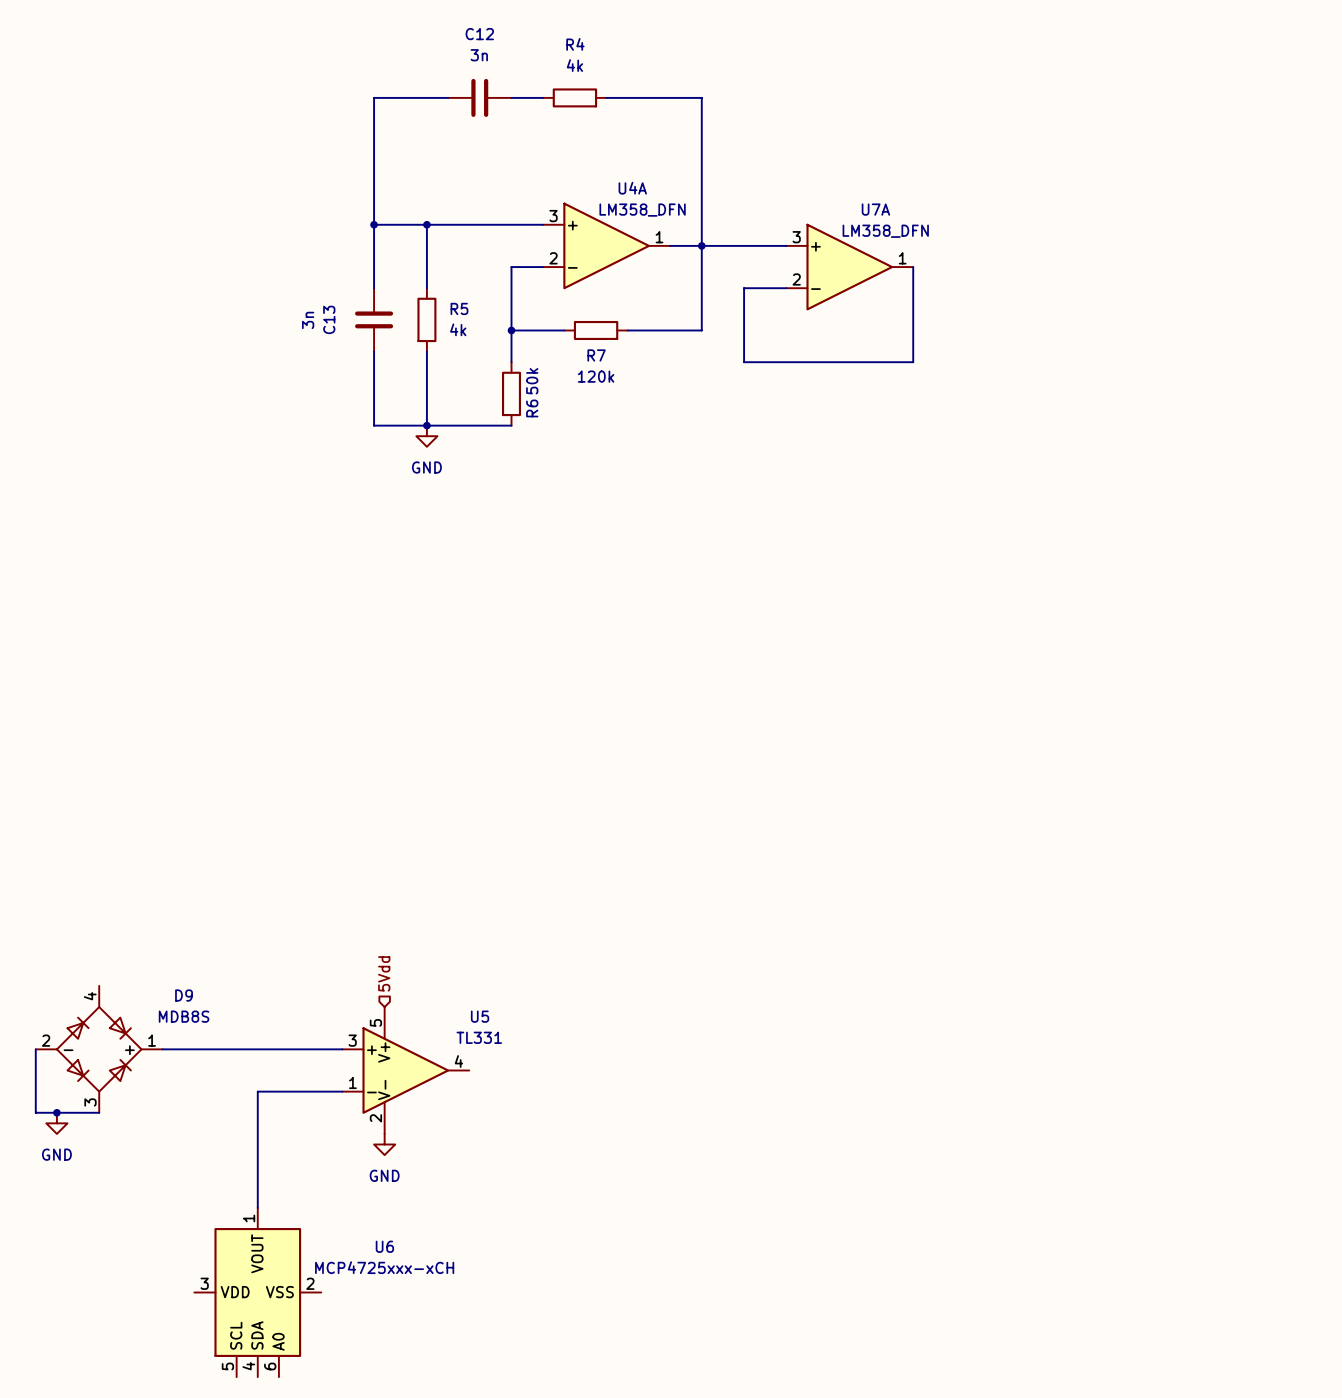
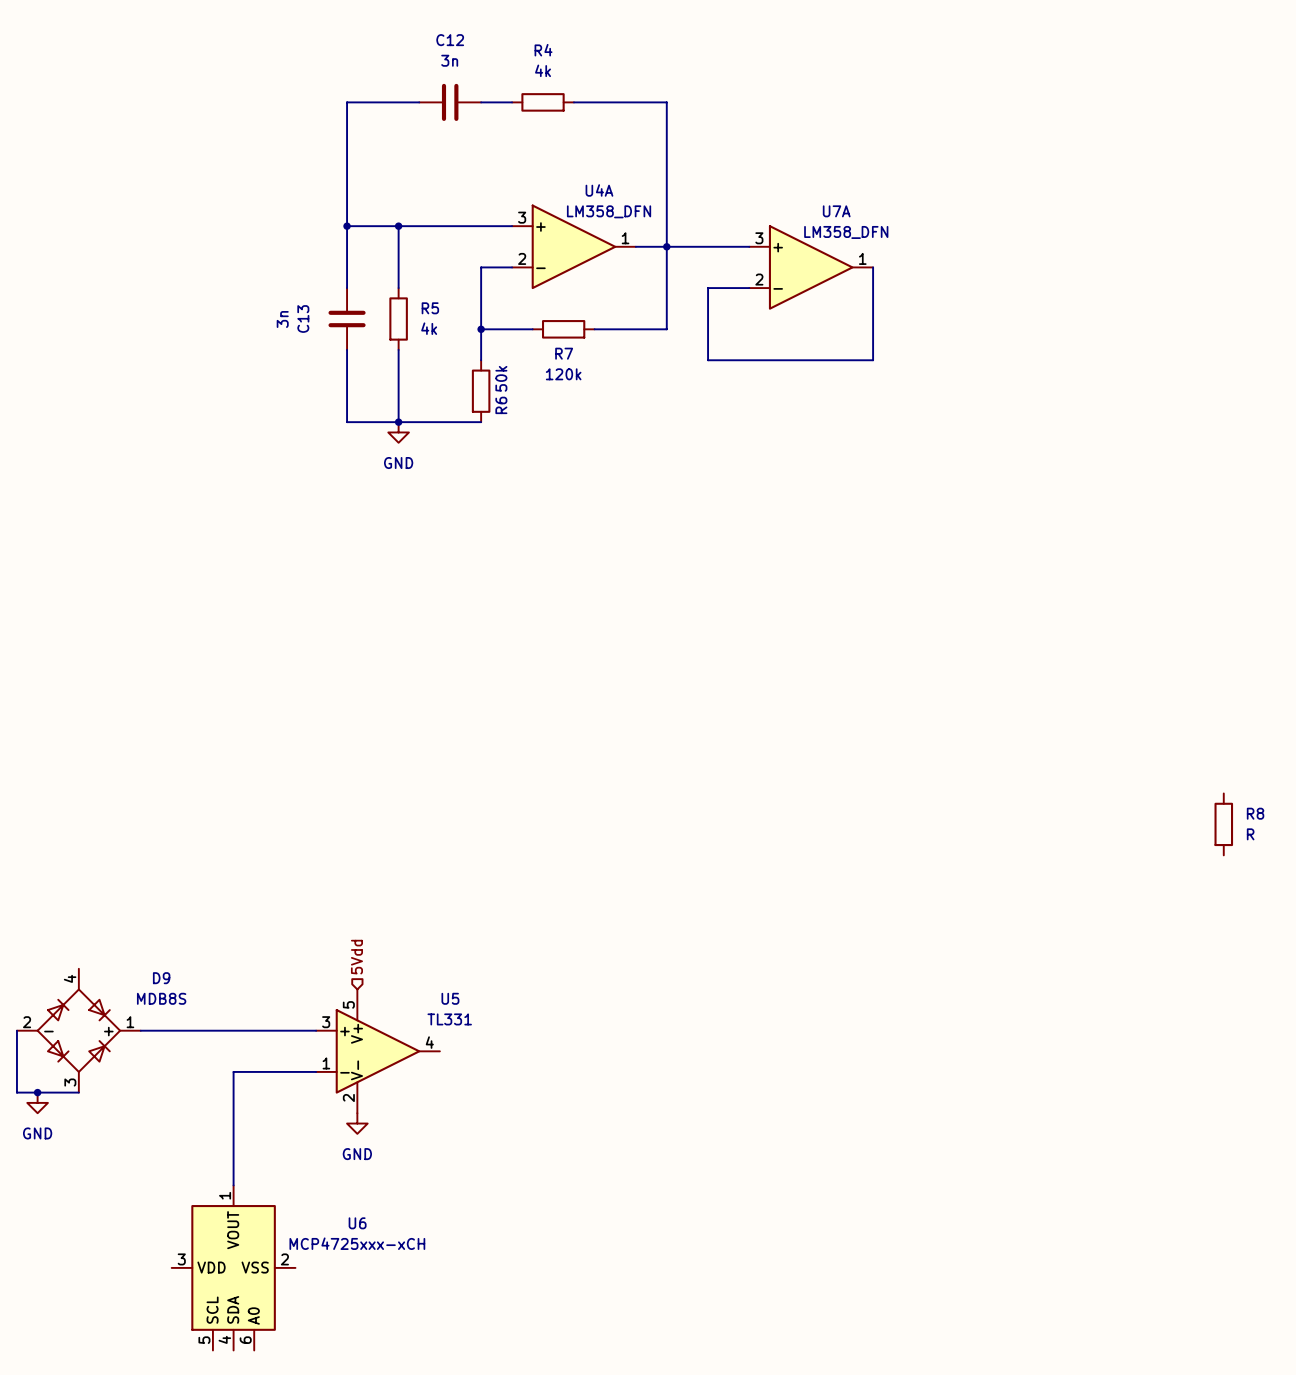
R8: none -> R (1223, 824)

